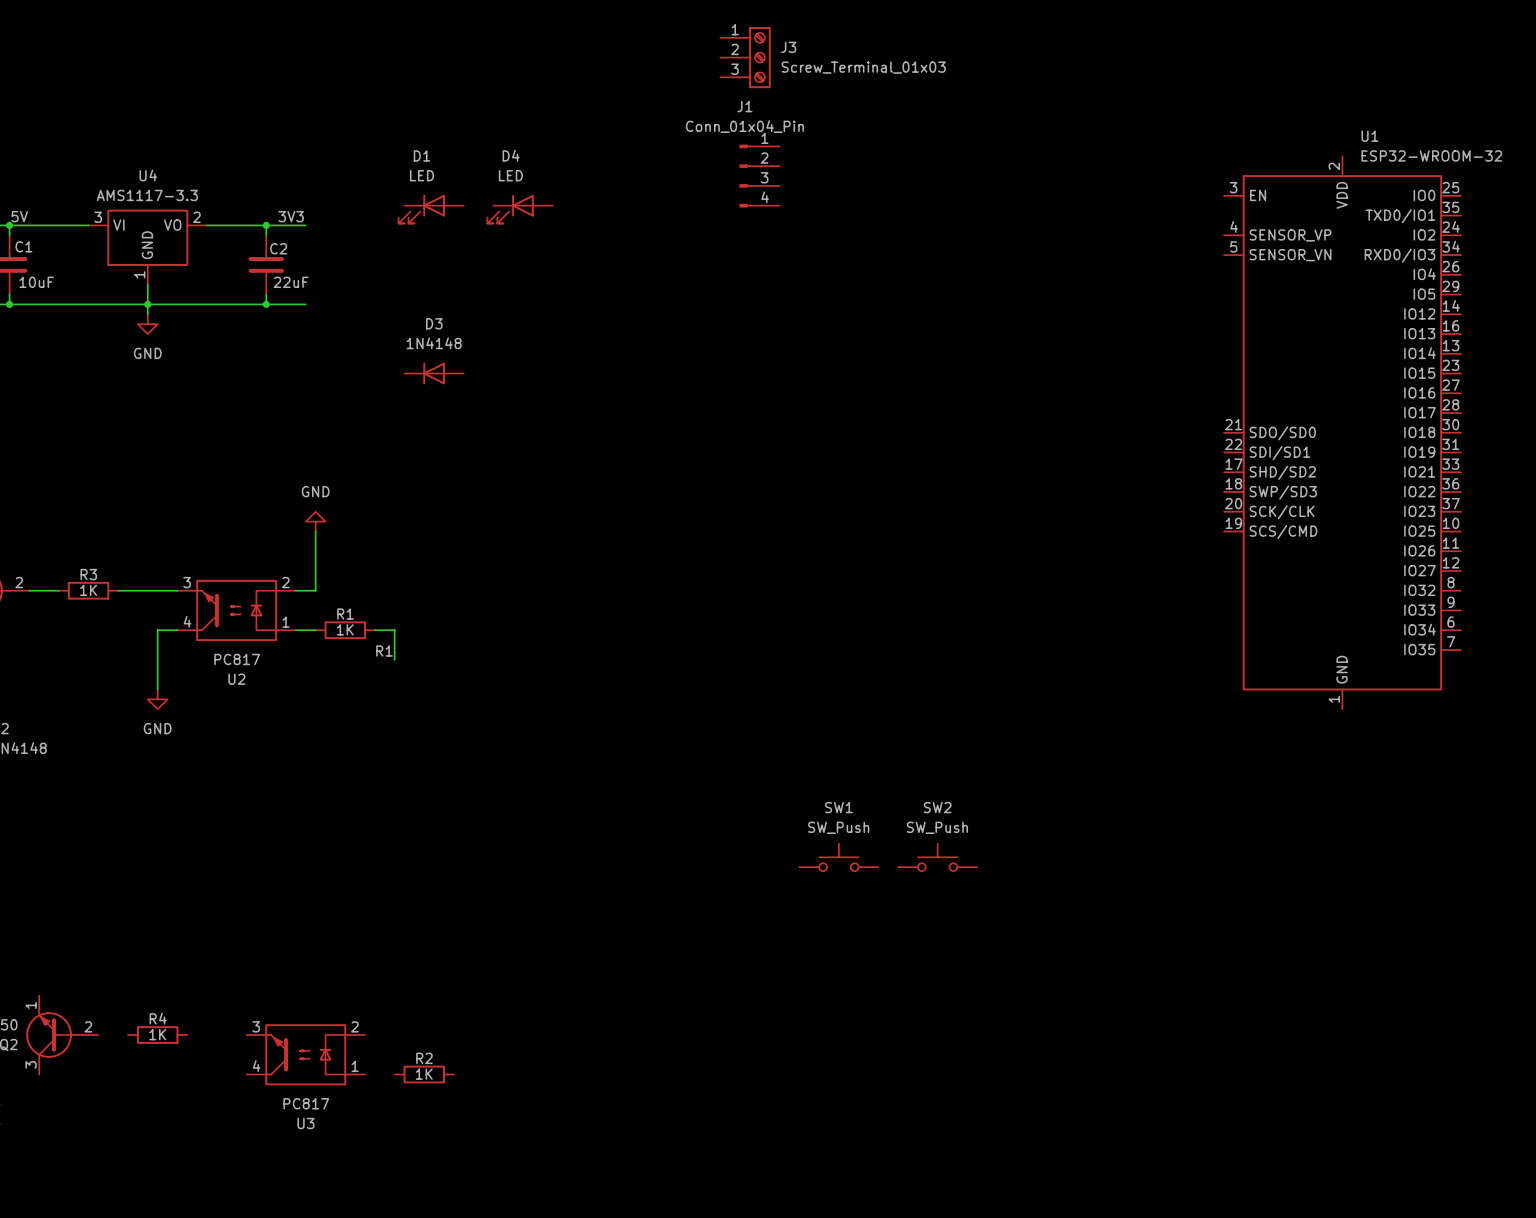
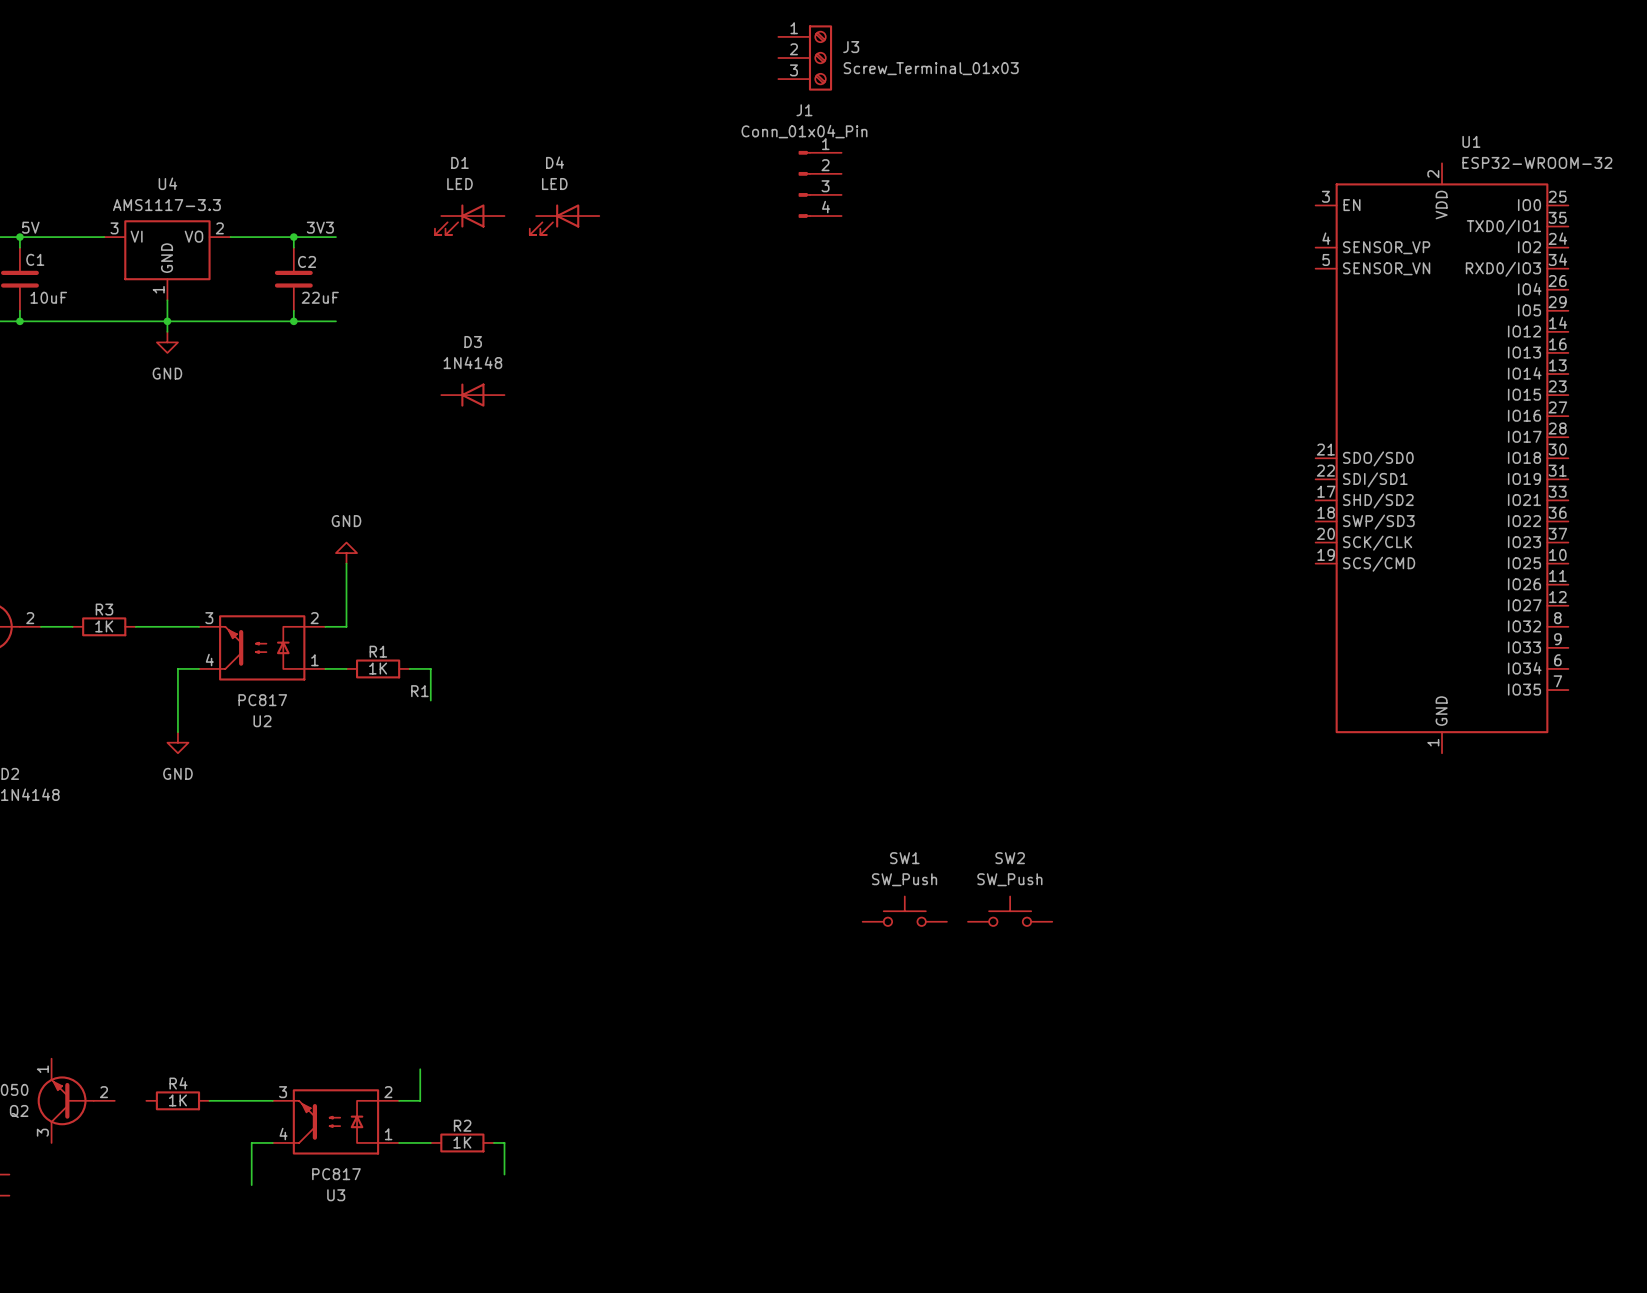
wire: none -> (420, 1069) (420, 1100) (399, 1100)
wire: none -> (209, 1100) (272, 1100)
wire: none -> (272, 1142) (251, 1142) (251, 1185)
wire: none -> (399, 1142) (430, 1142)
wire: none -> (493, 1142) (504, 1142) (504, 1174)

